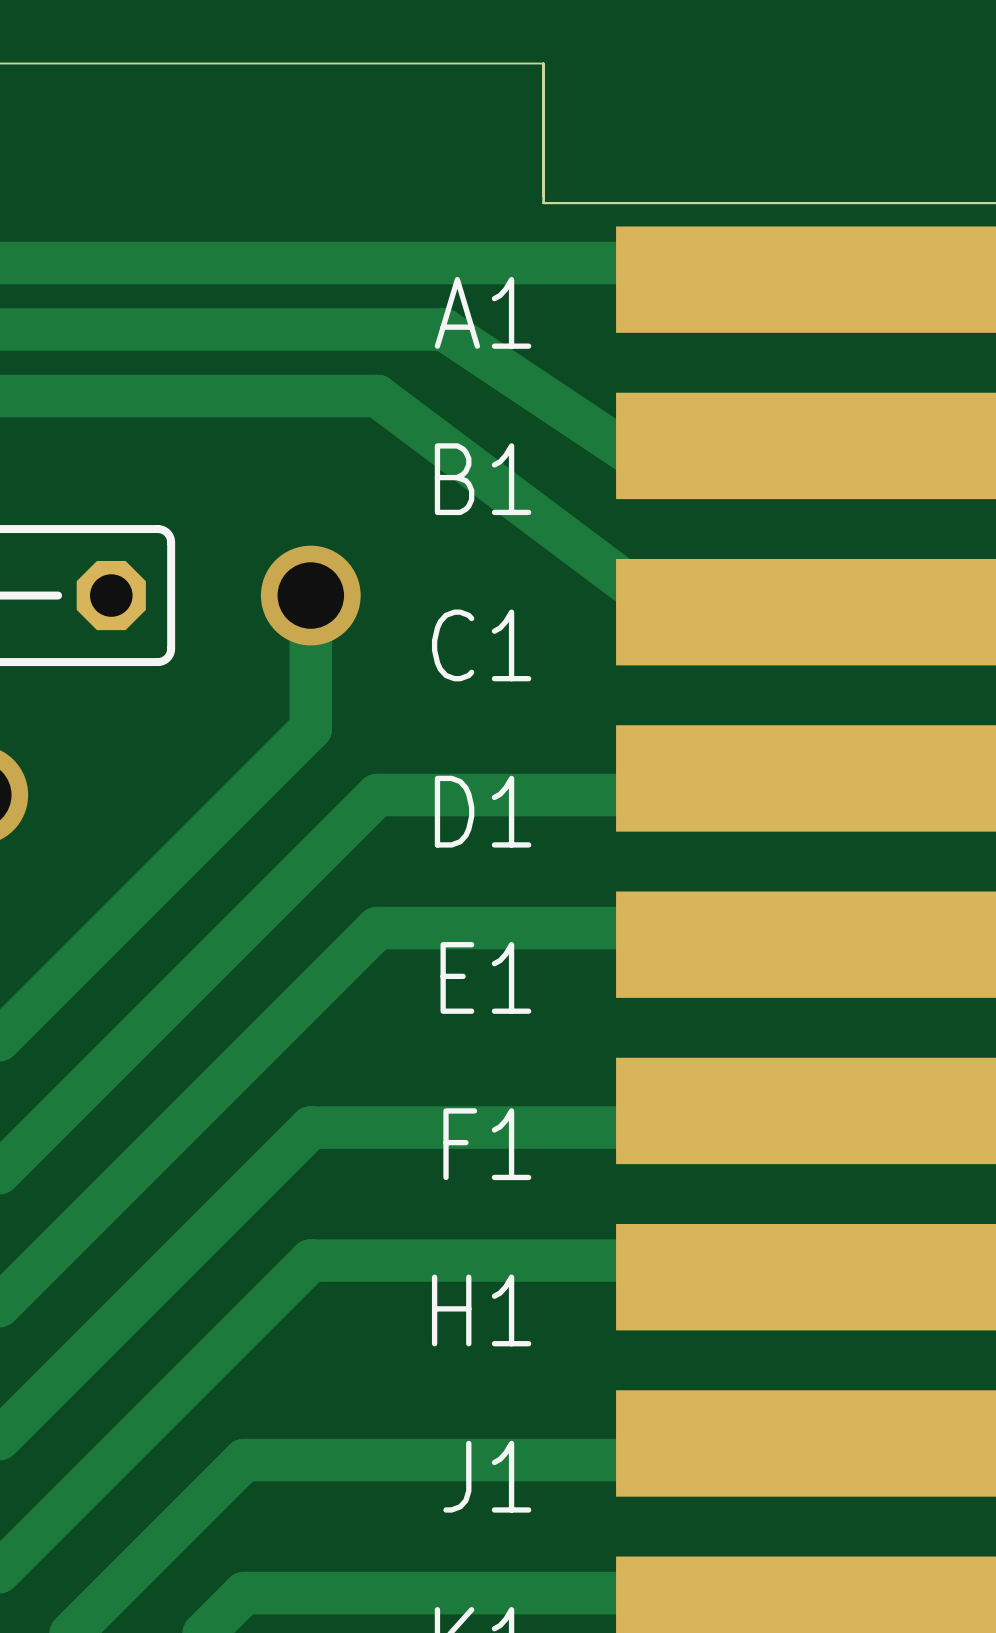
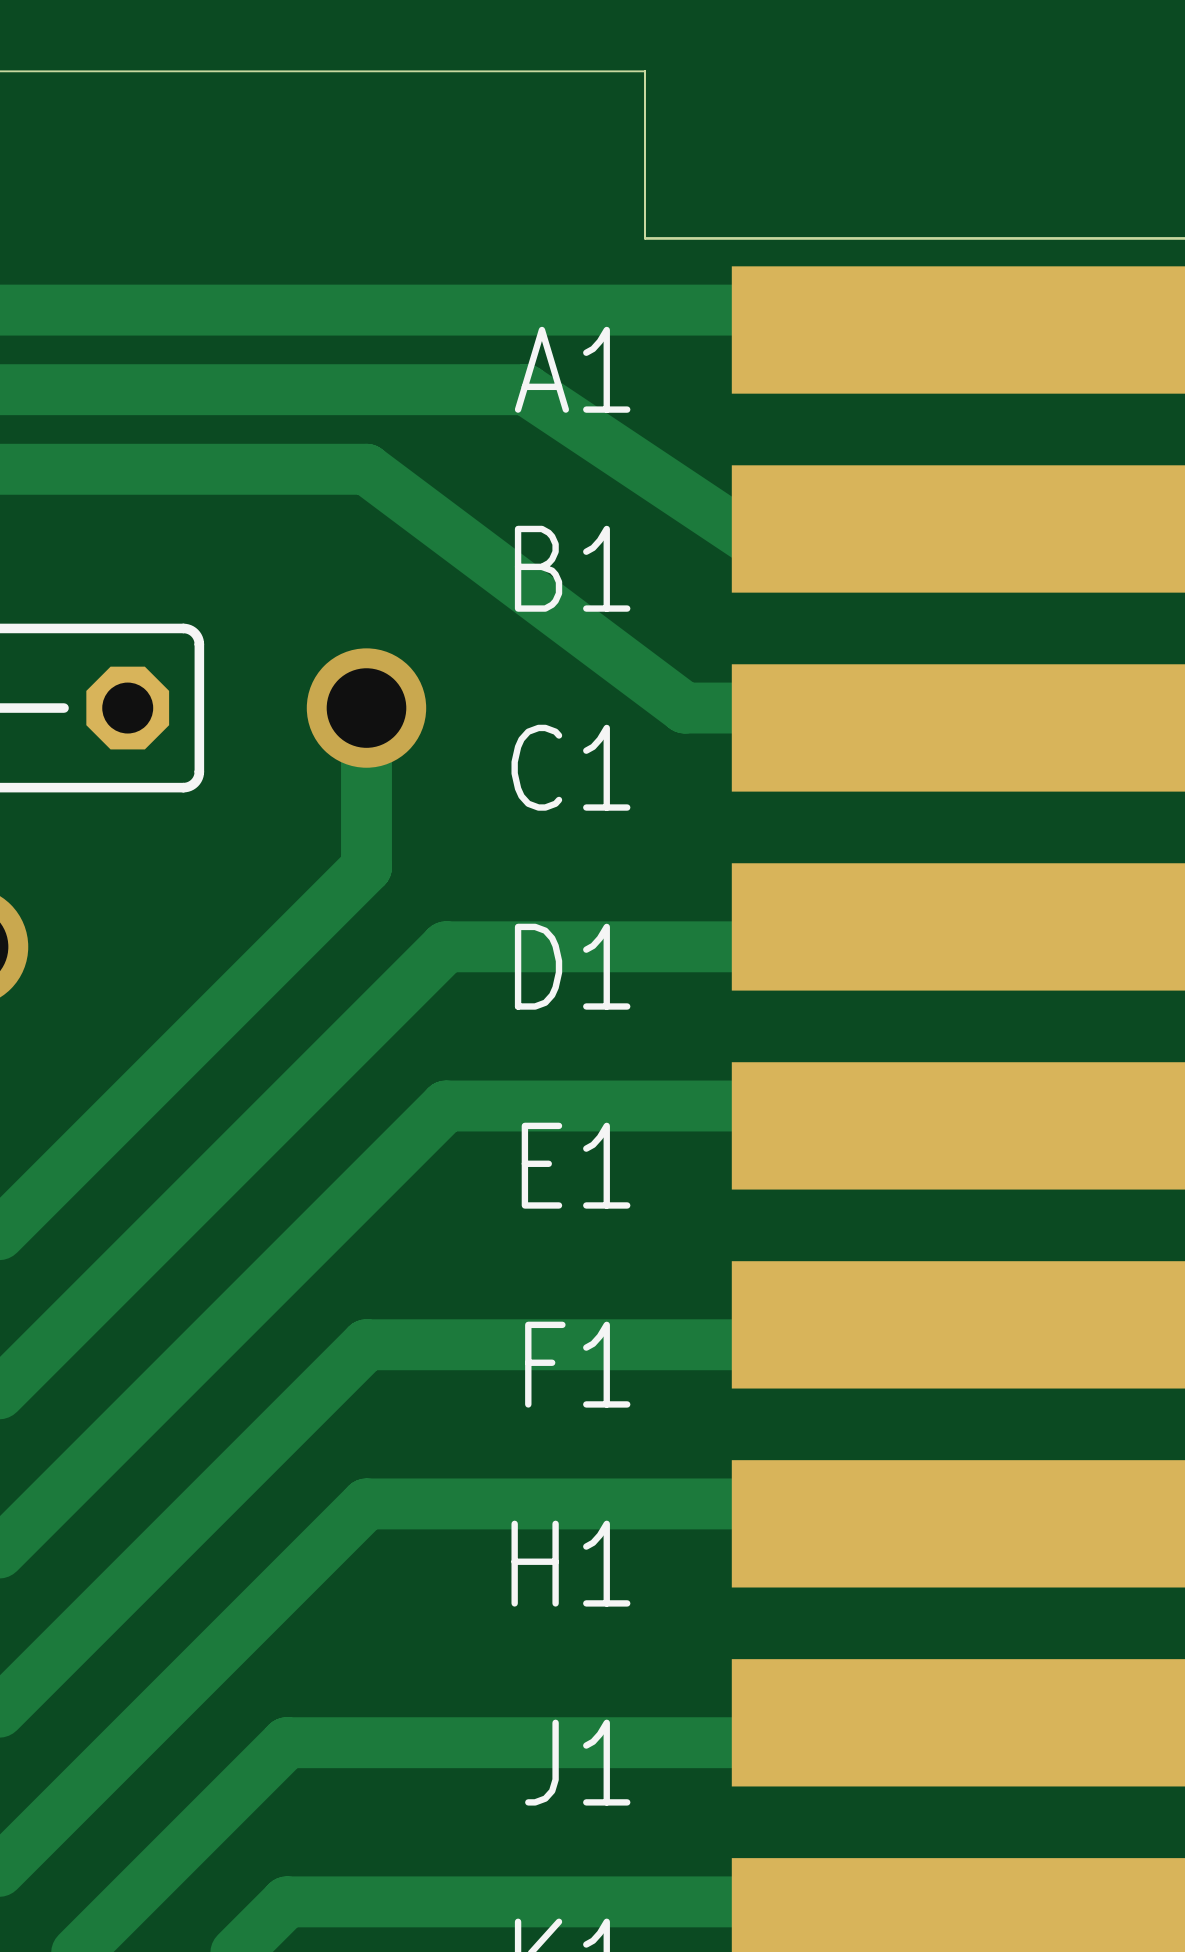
track: (310, 396) (377, 396) (643, 595) -> (366, 469) (684, 708) (764, 708)

